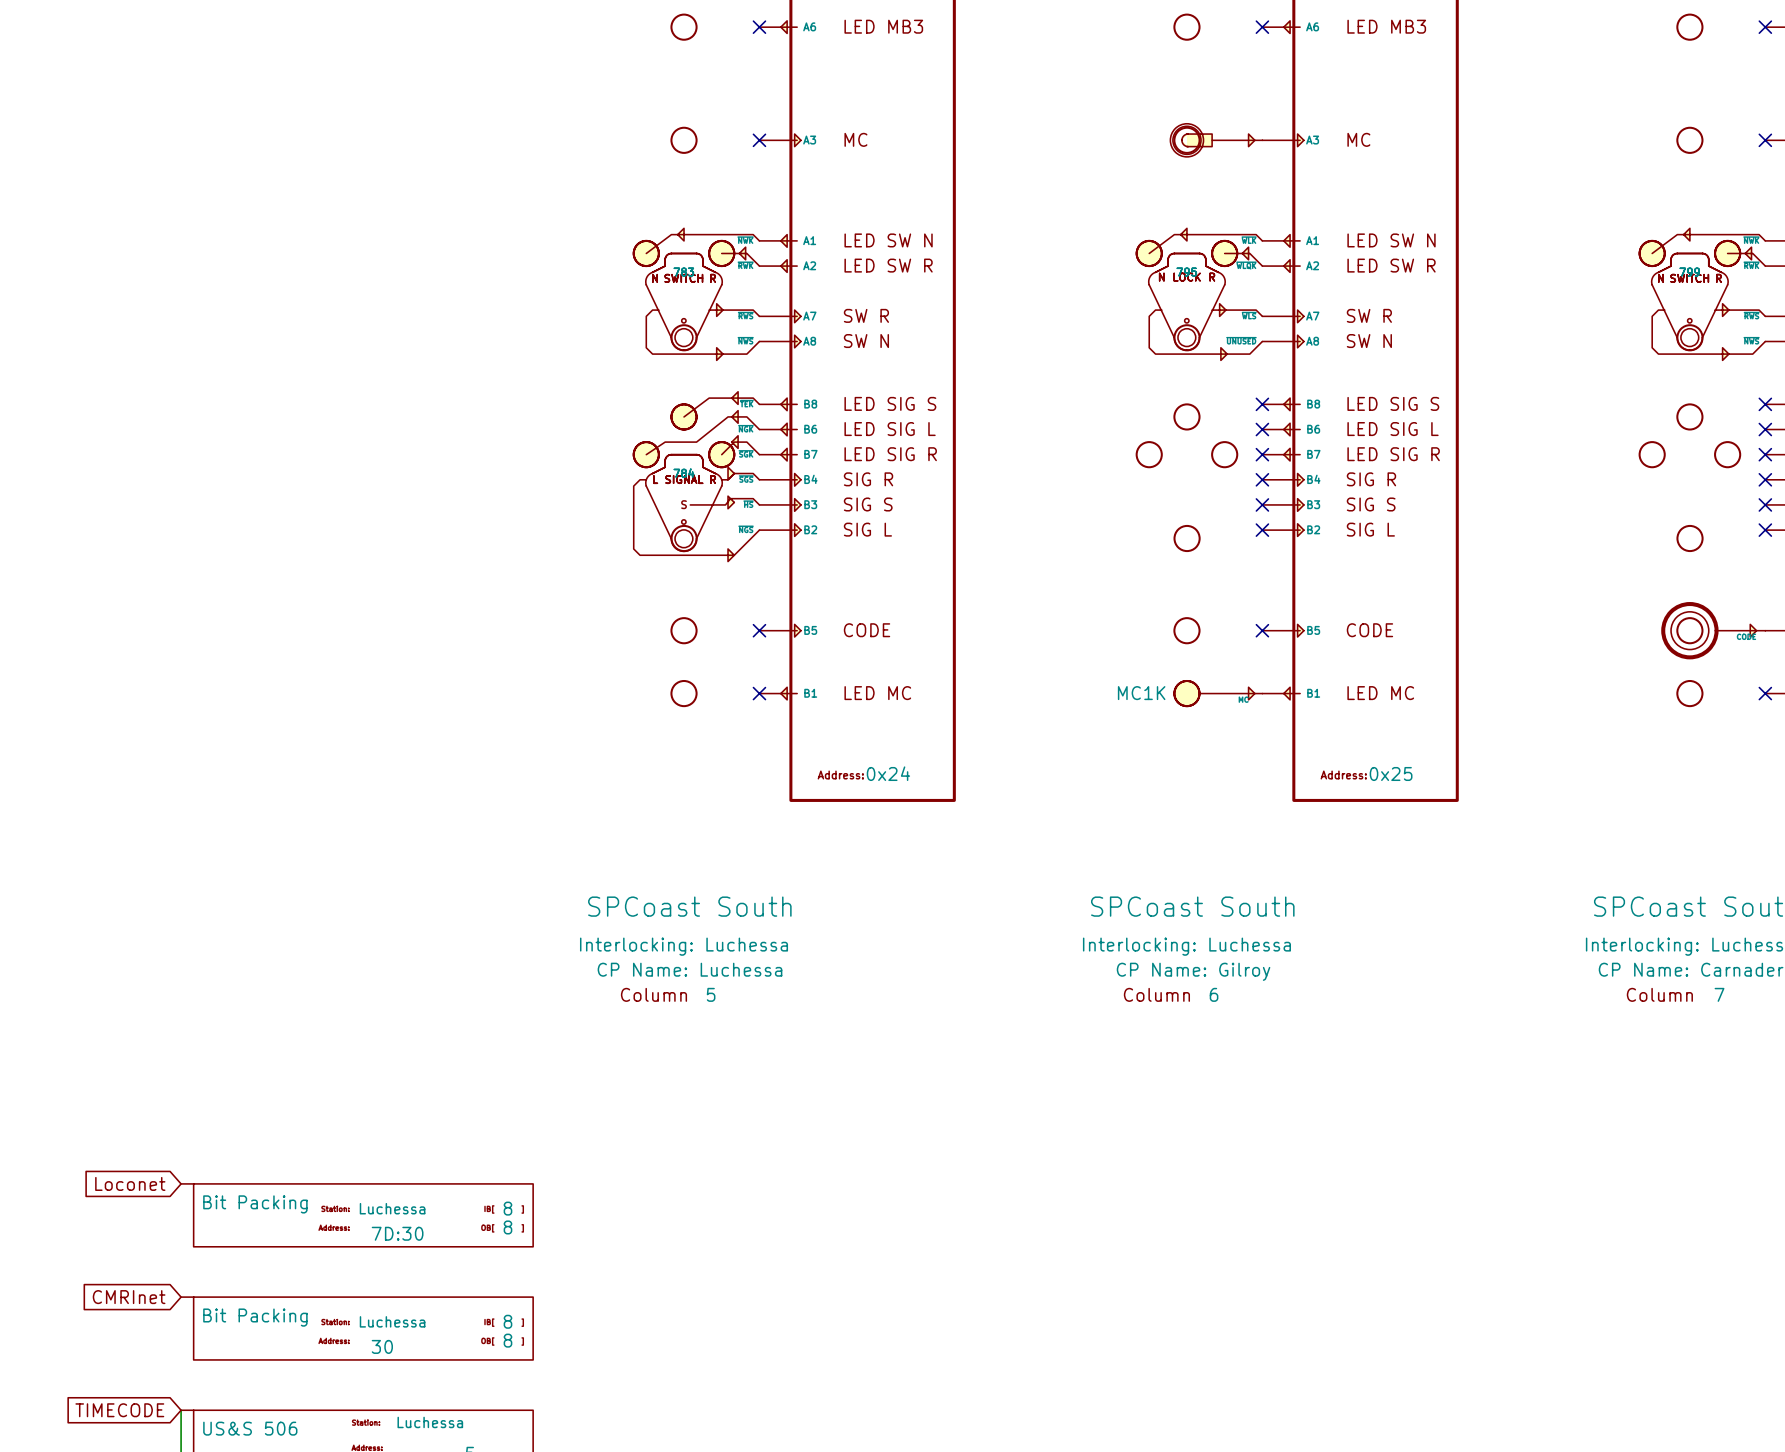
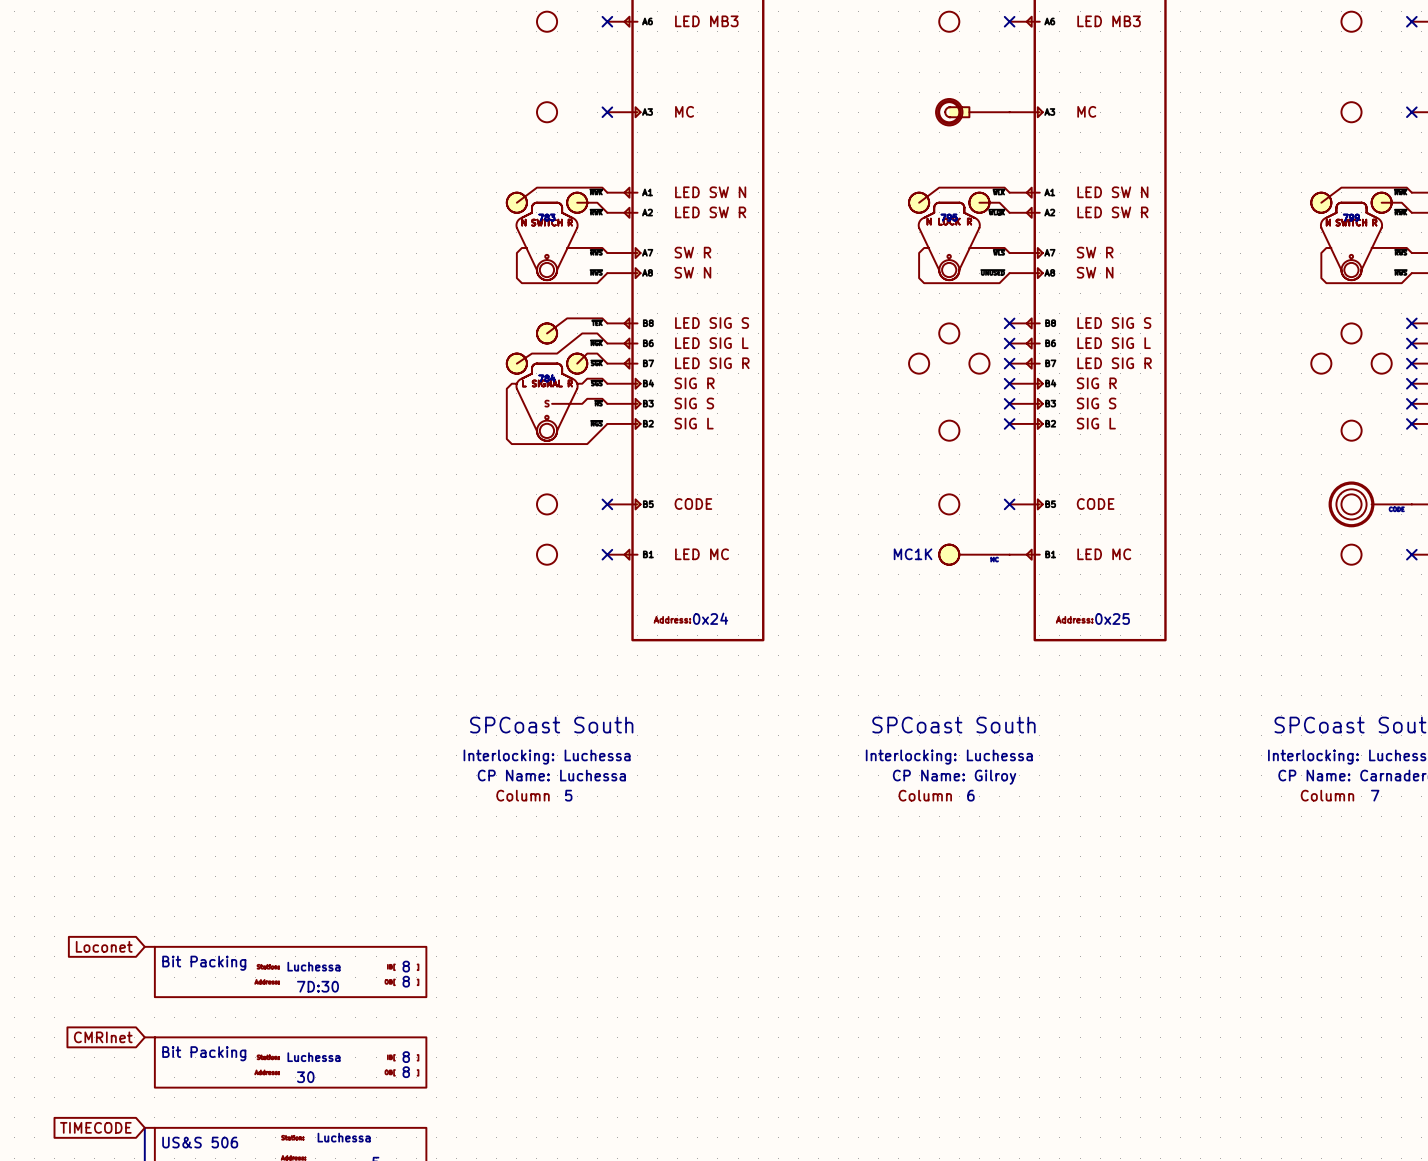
part symbol: [1170, 123, 1263, 157] -> [936, 98, 1010, 126]
part symbol: [632, 228, 760, 273] -> [506, 187, 608, 218]
part symbol: [1135, 228, 1263, 273] -> [908, 187, 1010, 218]
part symbol: [1638, 228, 1766, 273] -> [1310, 187, 1412, 218]
part symbol: [645, 253, 760, 361] -> [516, 202, 608, 284]
part symbol: [1148, 253, 1263, 361] -> [918, 202, 1010, 284]
part symbol: [1651, 253, 1766, 361] -> [1320, 202, 1412, 284]
part symbol: [632, 391, 760, 474] -> [506, 318, 608, 379]
part symbol: [633, 454, 760, 562] -> [506, 363, 608, 445]
part symbol: [1661, 602, 1766, 660] -> [1328, 481, 1412, 528]
part symbol: [1173, 679, 1263, 708] -> [938, 543, 1010, 566]

